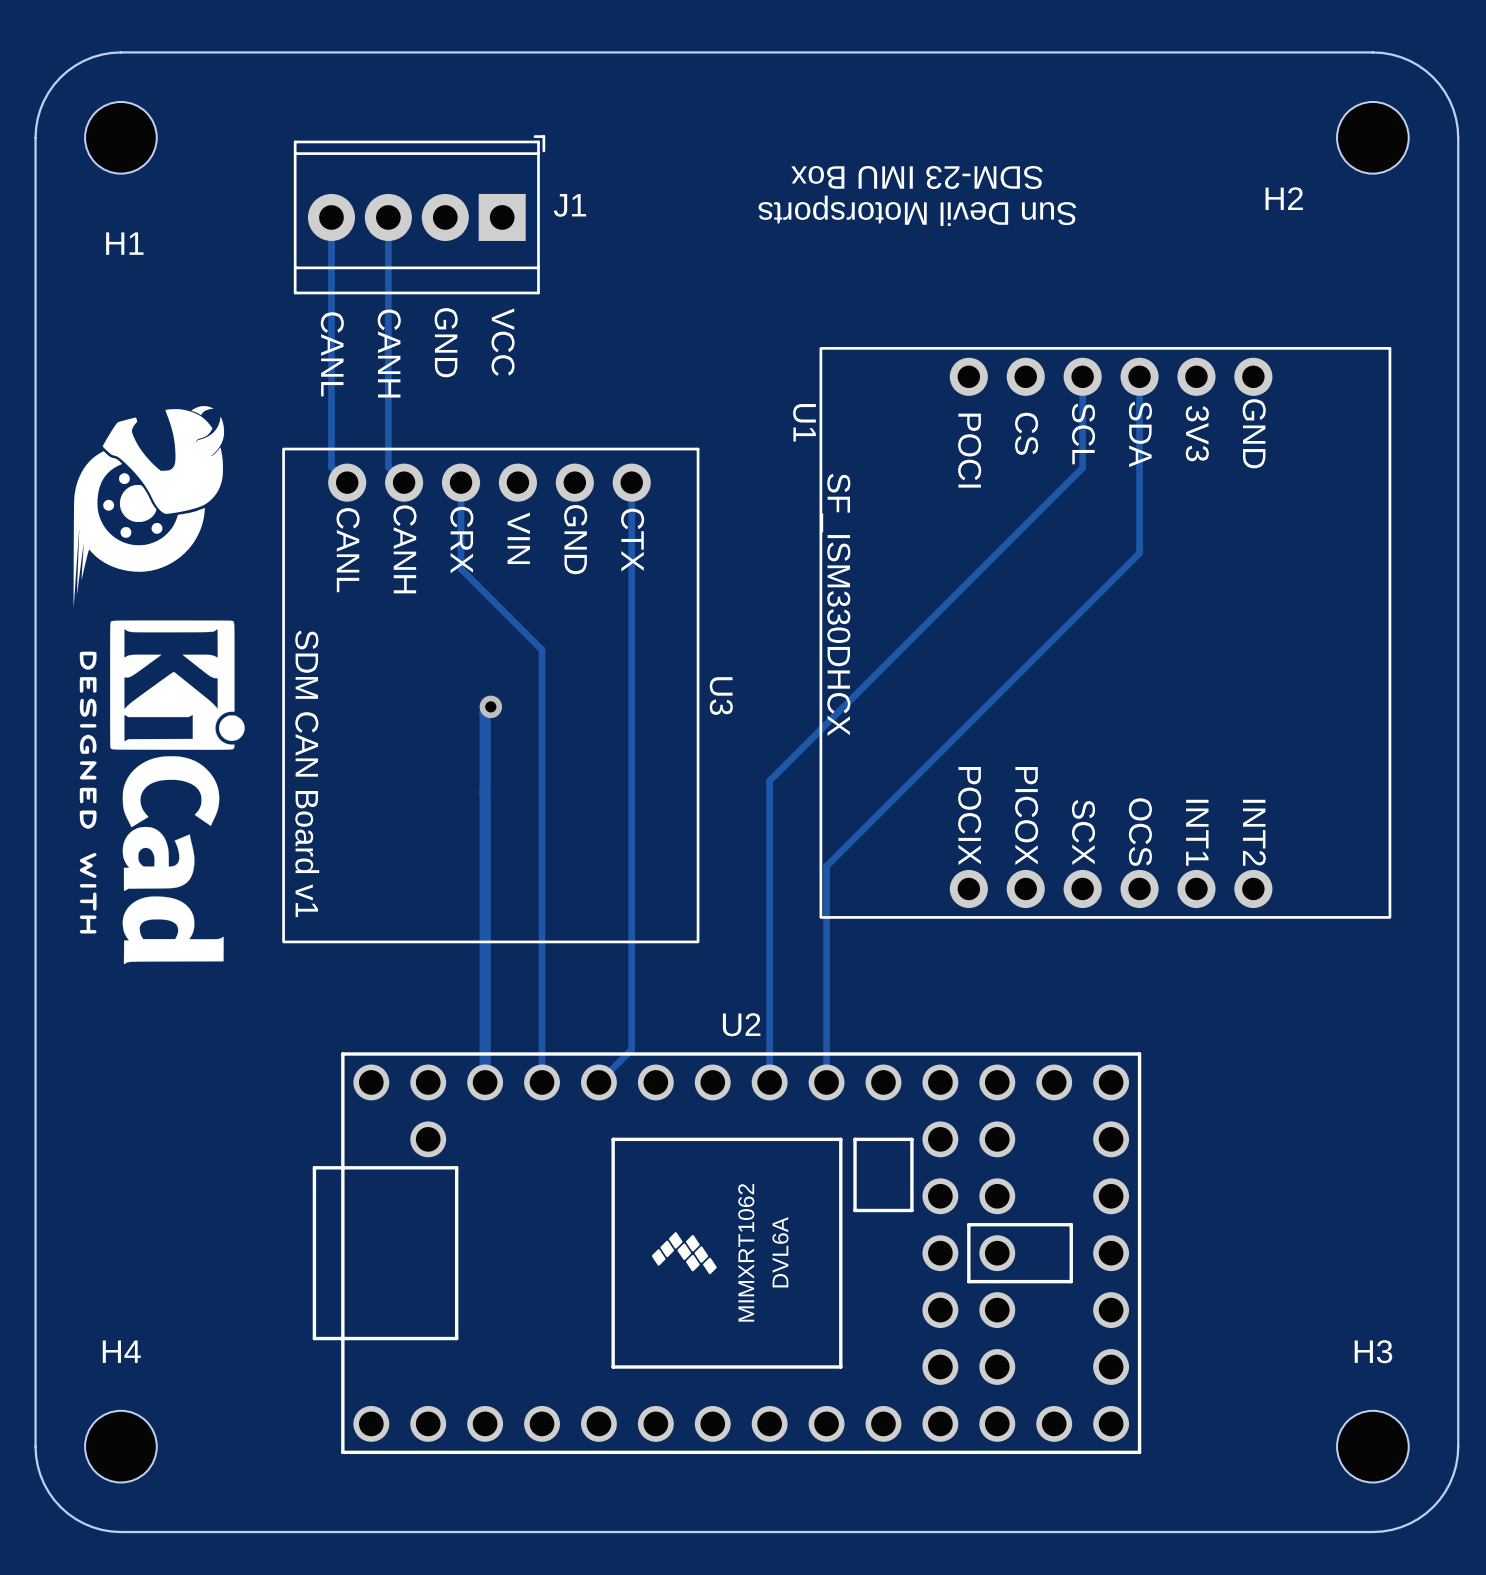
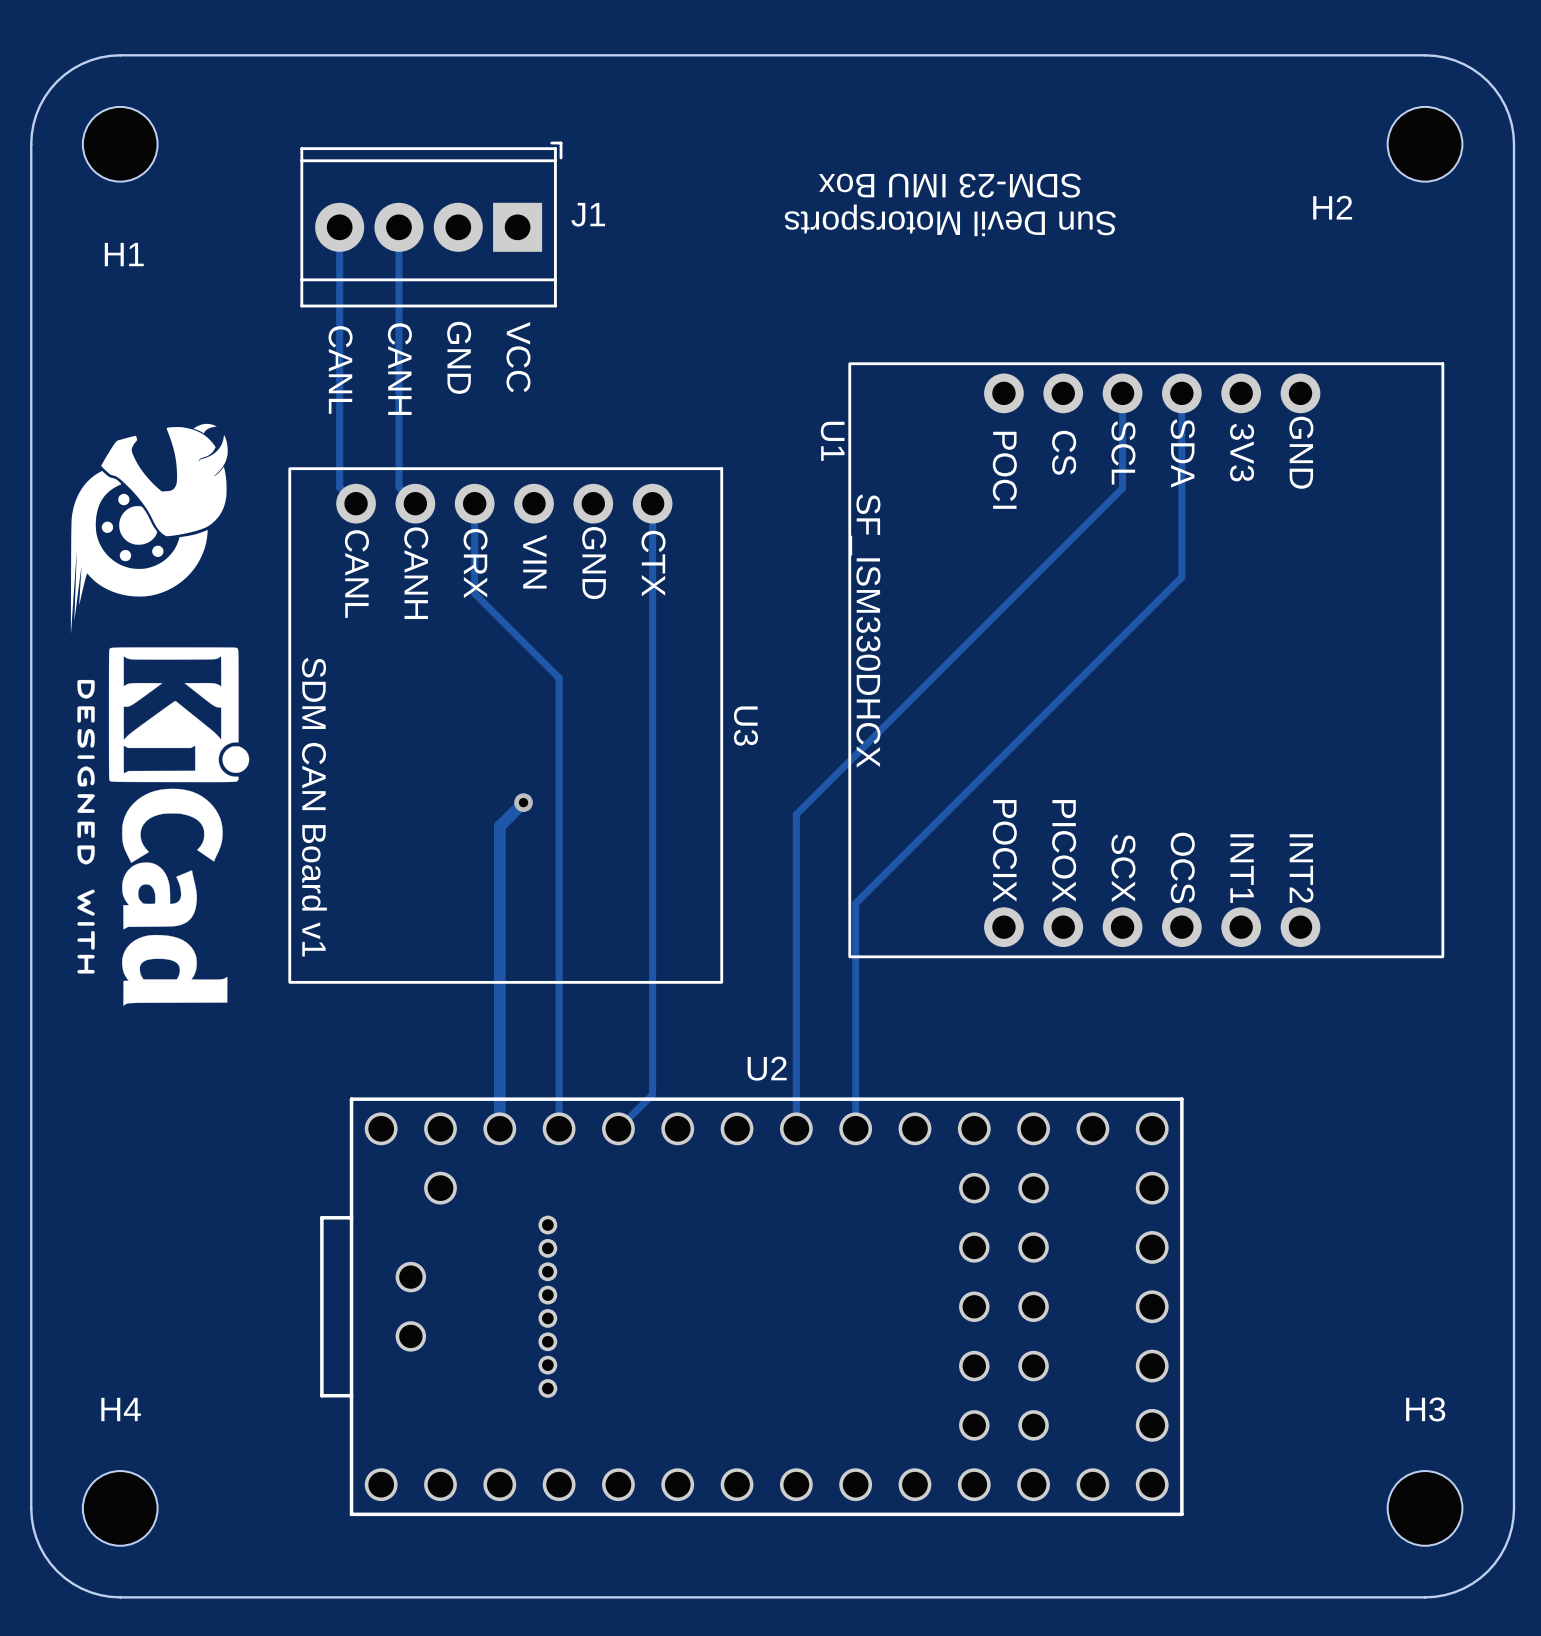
track: (490, 706) (485, 712) (485, 792) -> (523, 802) (499, 826)
via: (490, 706) -> none
via: none -> (523, 802)
U2 footprint: [312, 1052, 1142, 1455] -> [320, 1097, 1184, 1517]

